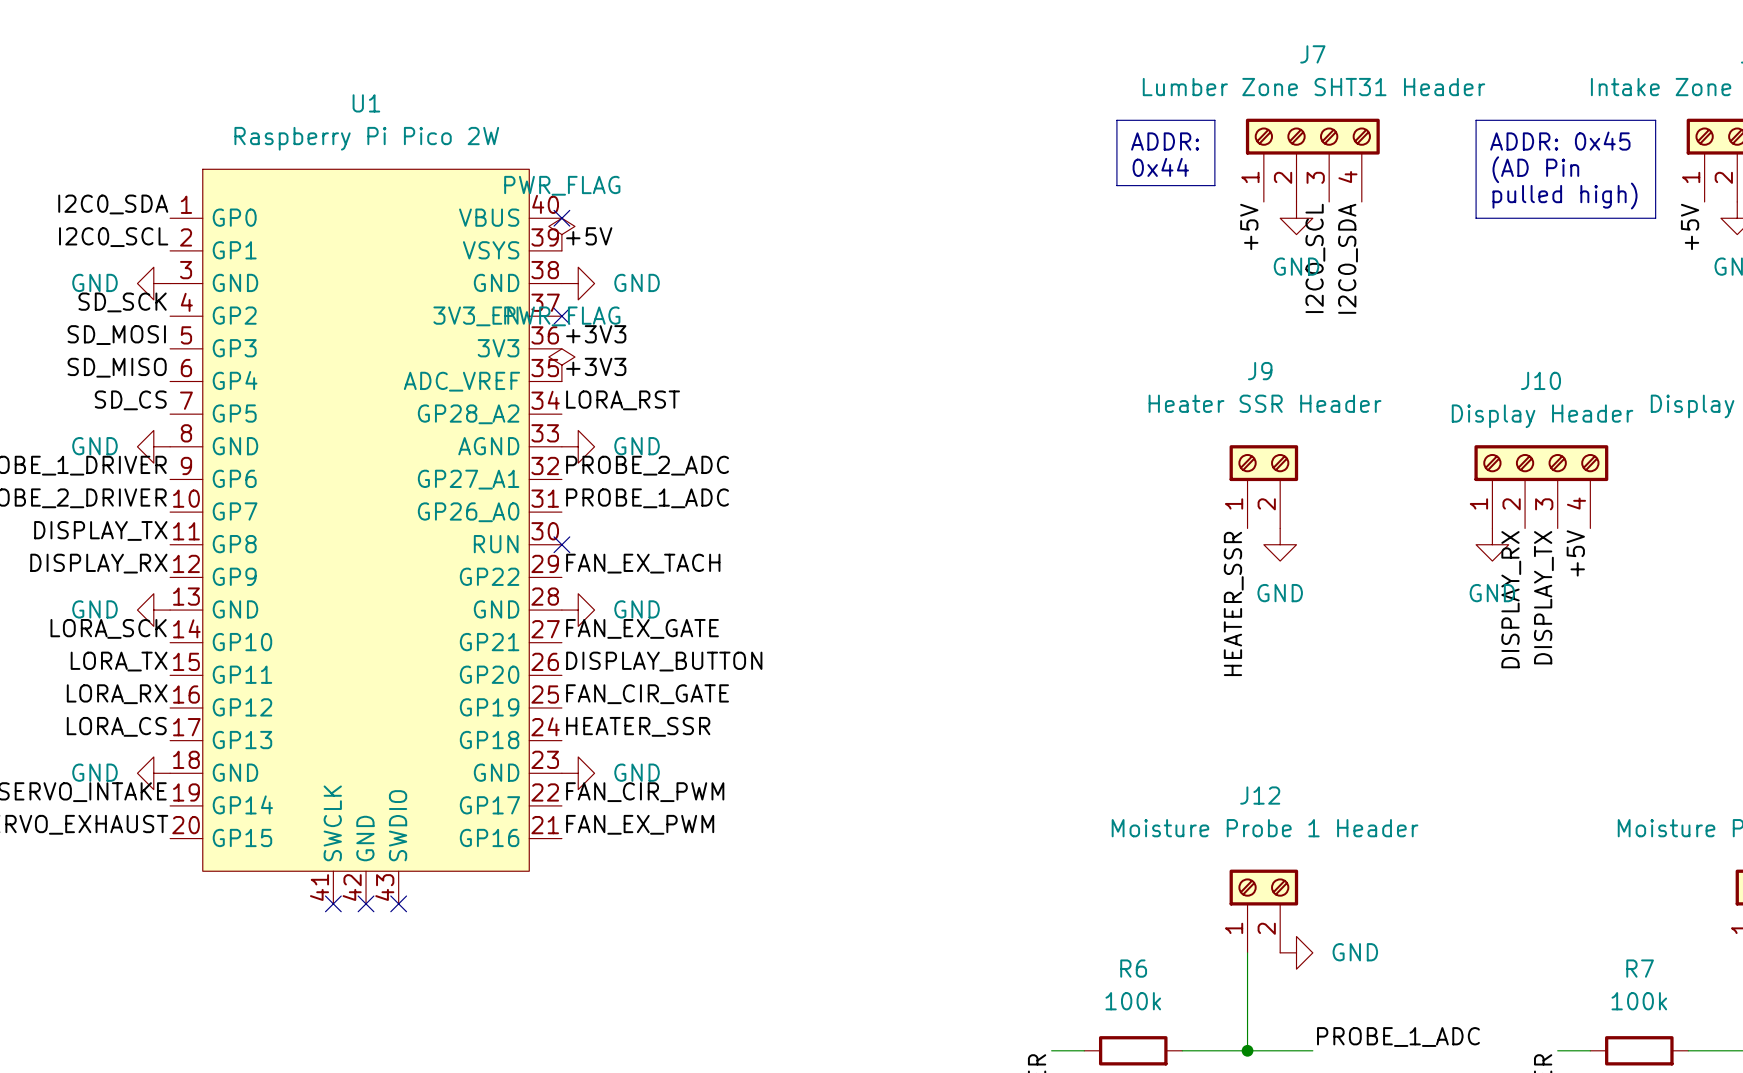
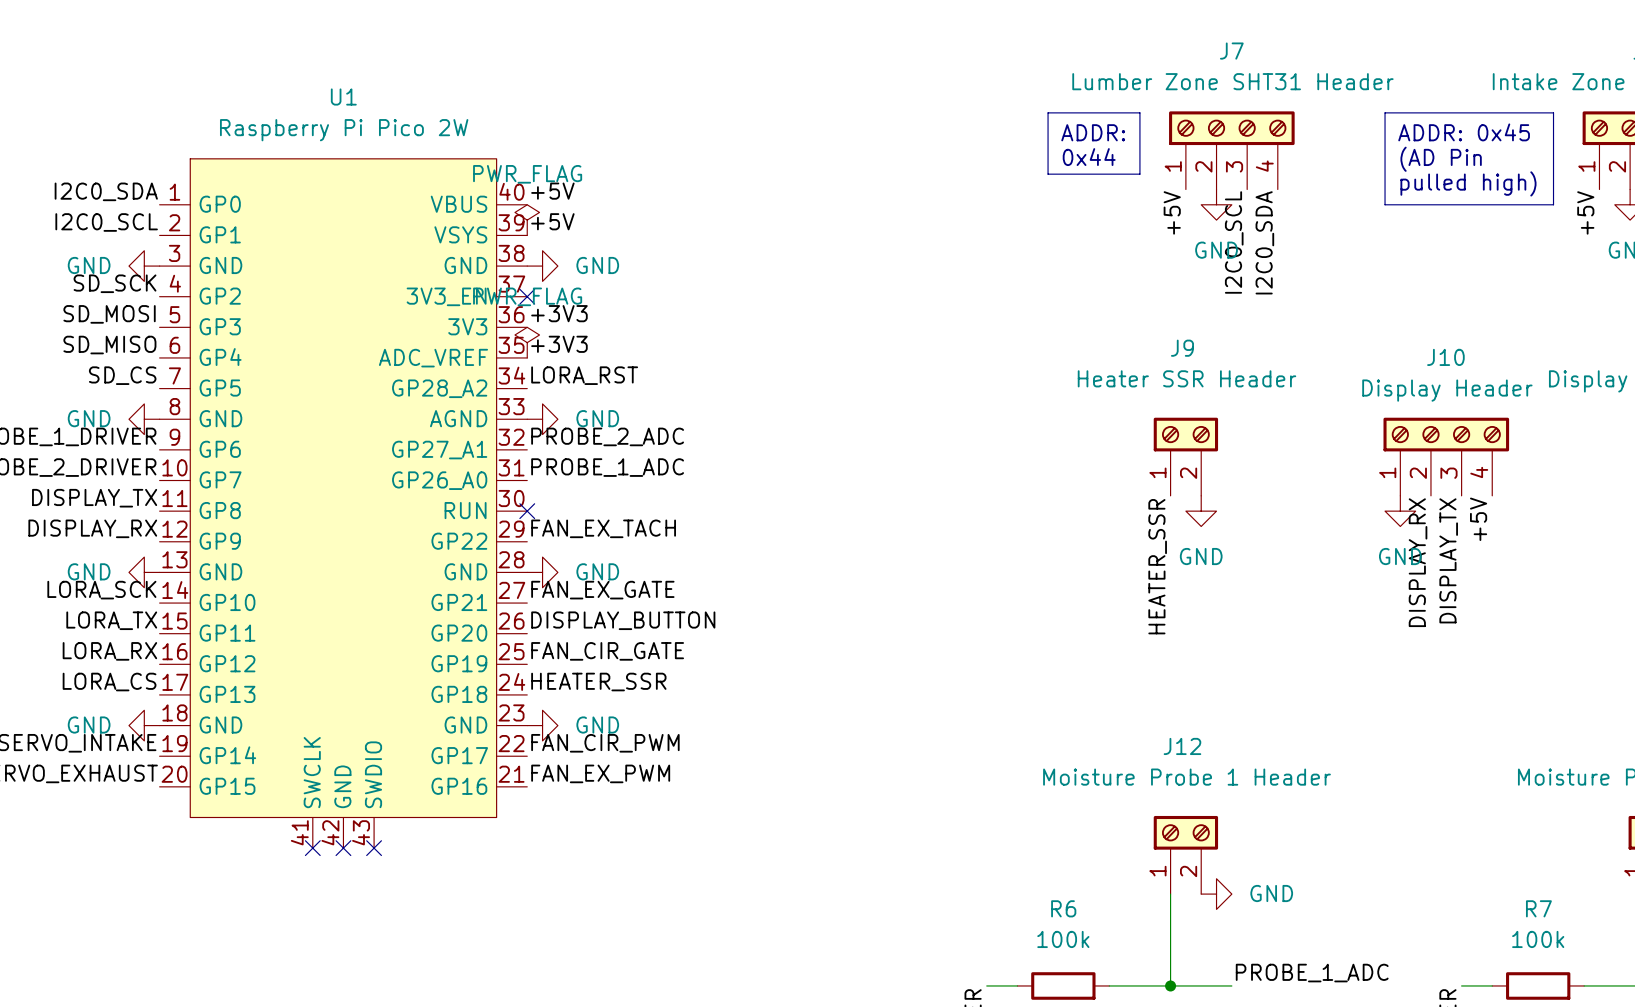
label: none -> +5V (552, 191)
no-connect mark: (561, 218) -> none

